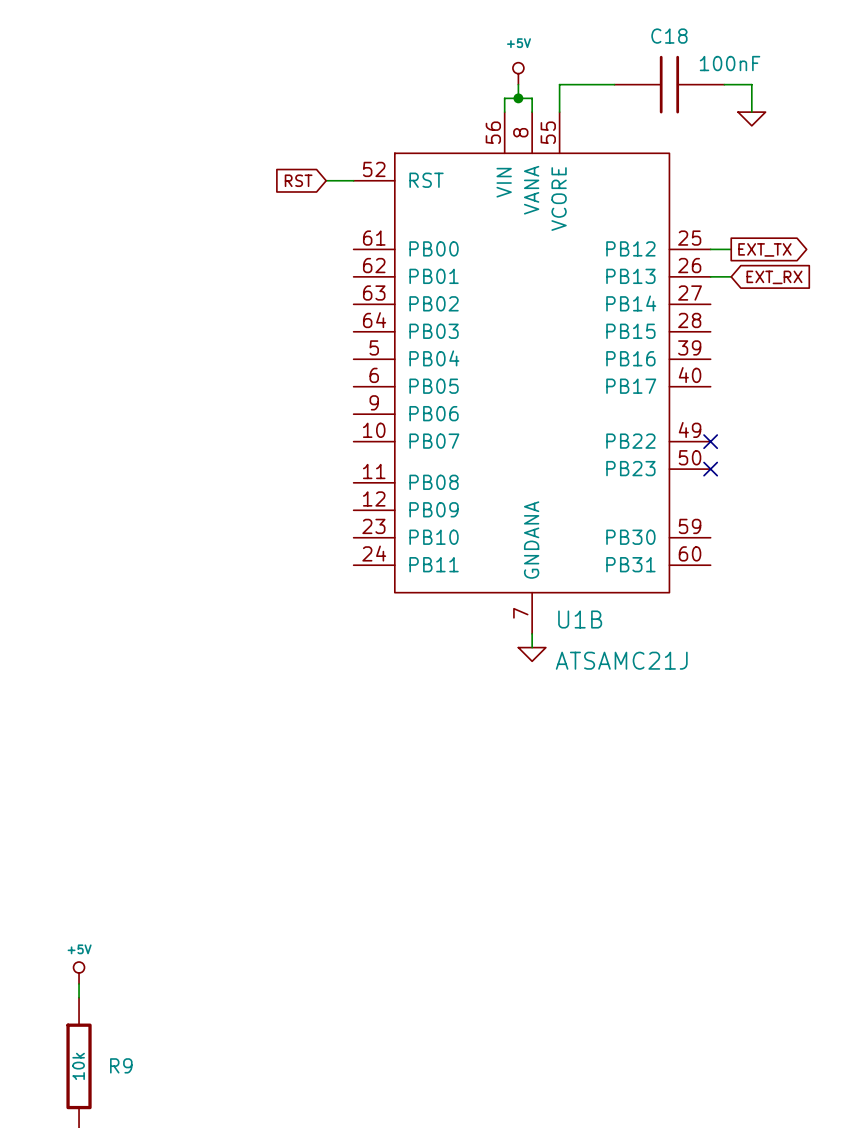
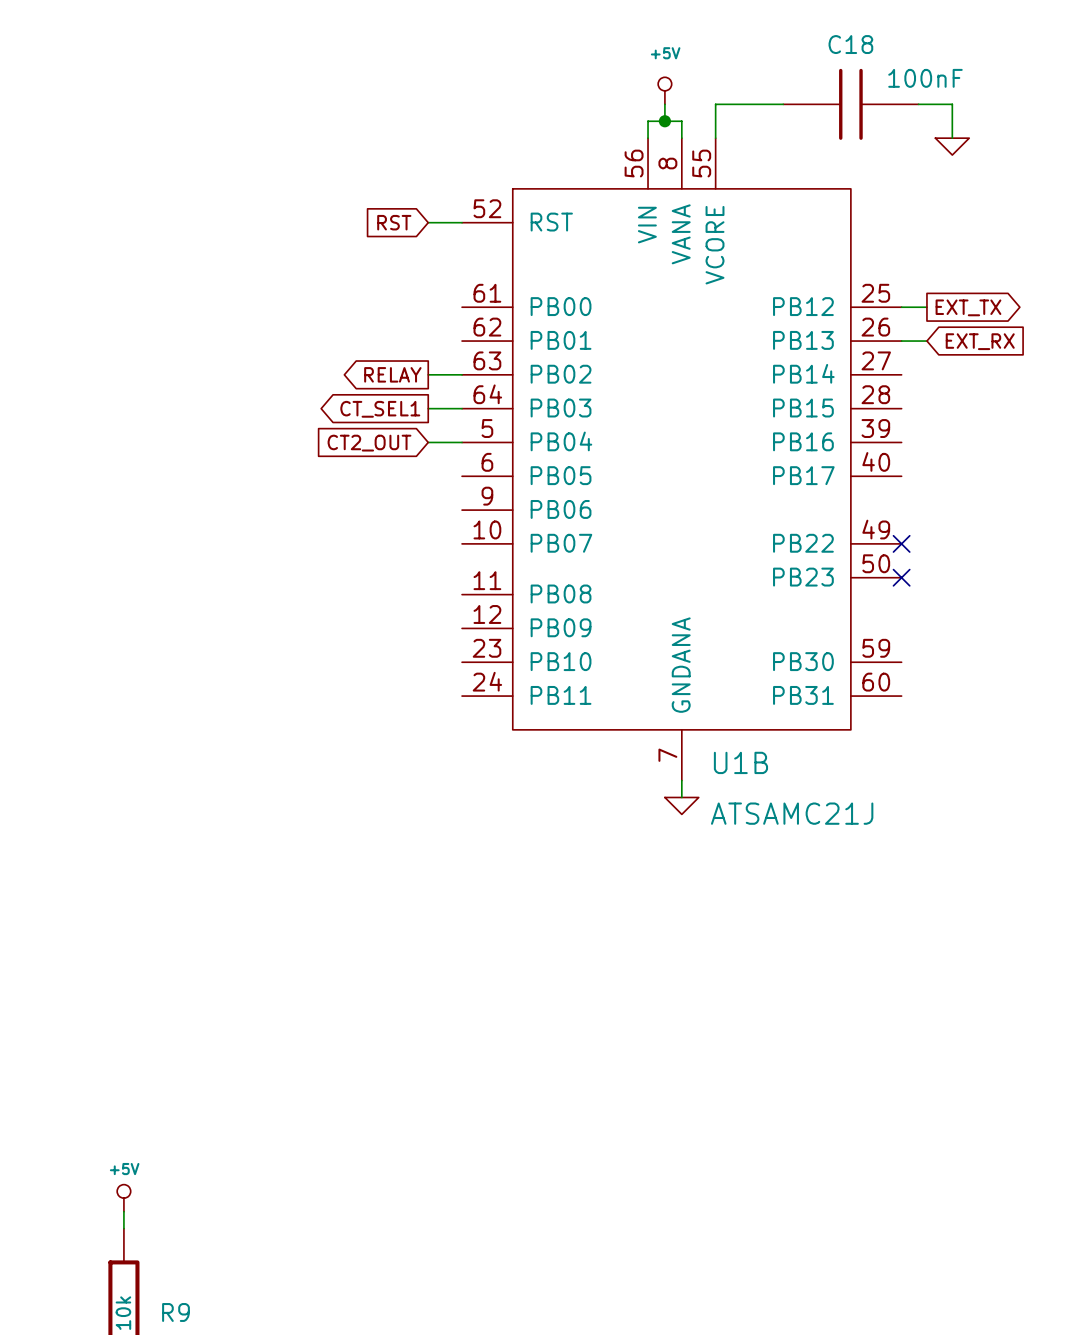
global label: none -> RELAY (392, 374)
wire: none -> (428, 374) (462, 374)
wire: none -> (428, 408) (462, 408)
global label: none -> CT_SEL1 (380, 409)
global label: none -> CT2_OUT (369, 443)
wire: none -> (428, 442) (462, 442)

